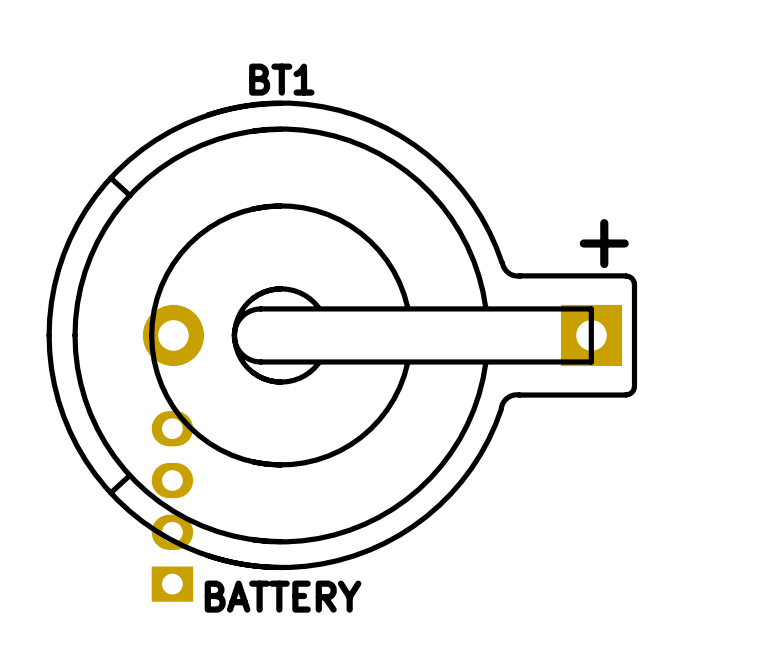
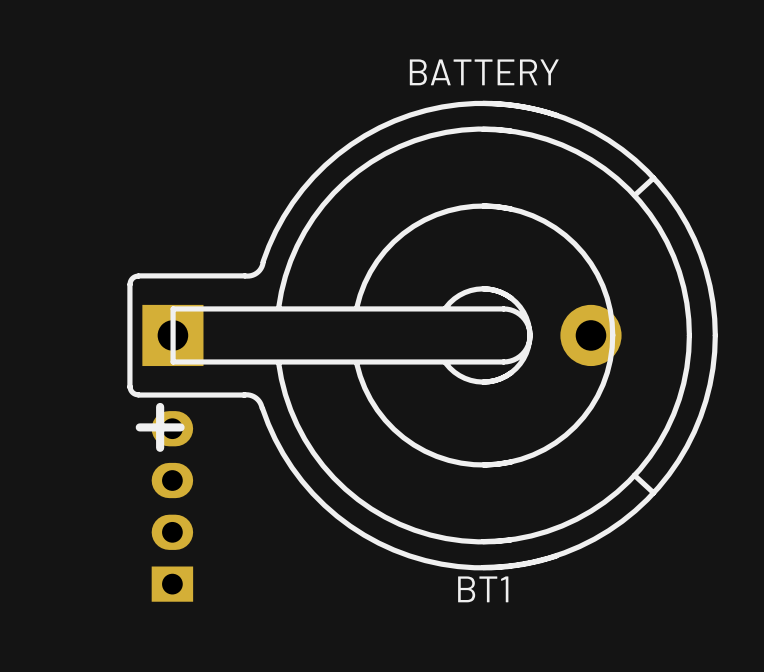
BT1 rotation: 0° (341, 335) -> 180° (422, 335)

